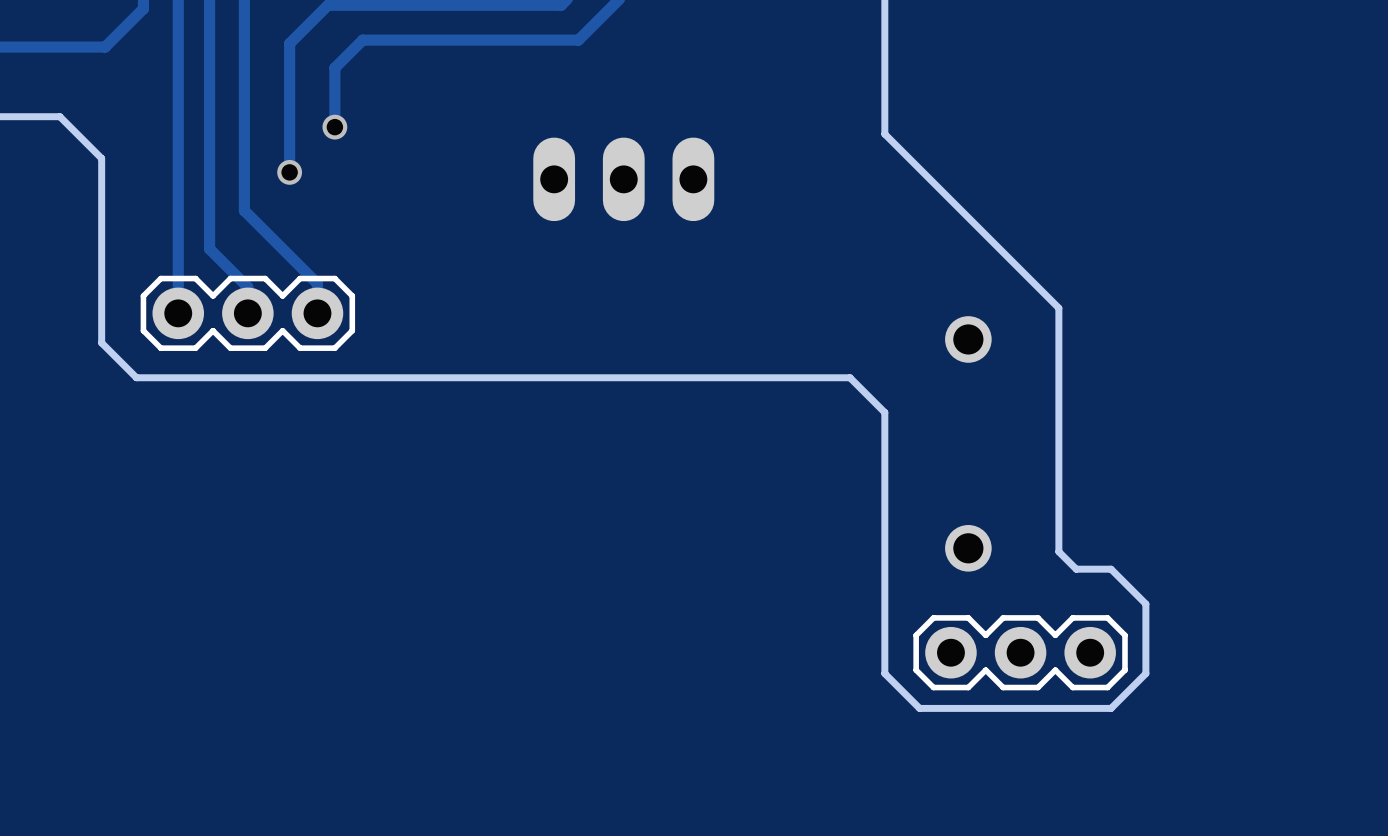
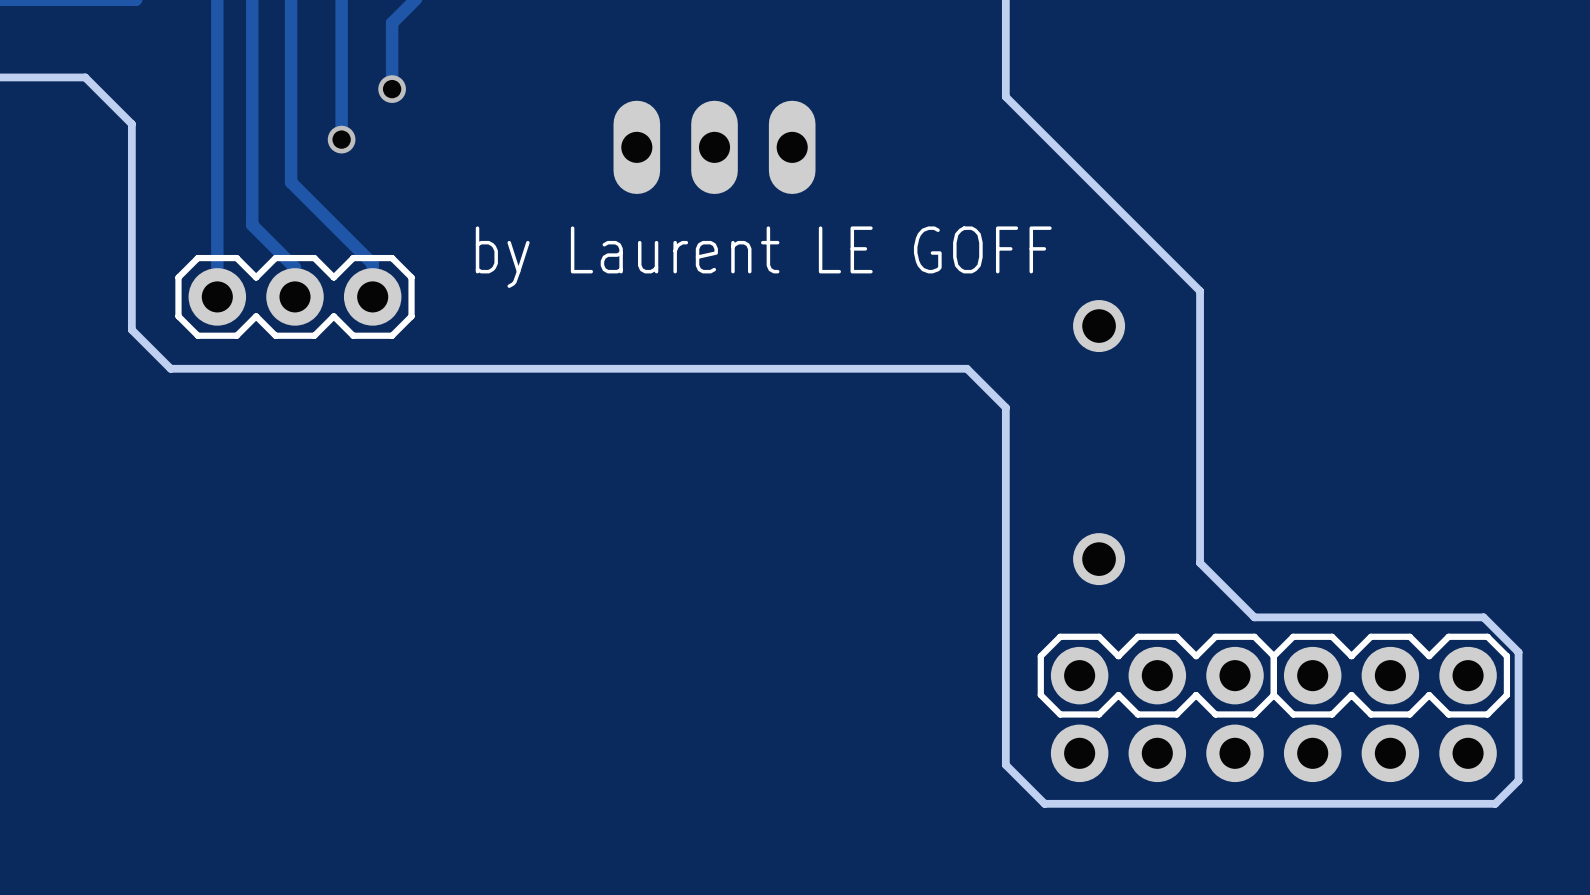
text: none -> by Laurent LE GOFF (763, 257)
board edge: (1076, 569) (1111, 569) (1145, 603) (1145, 673) (1111, 708) (919, 708) (884, 673) -> (1219, 582) (1254, 617) (1483, 617) (1518, 652) (1518, 780) (1495, 803) (1044, 803) (1005, 764) (1005, 698)
part: none -> (1390, 675)
part: none -> (1157, 753)
part: none -> (1390, 753)

